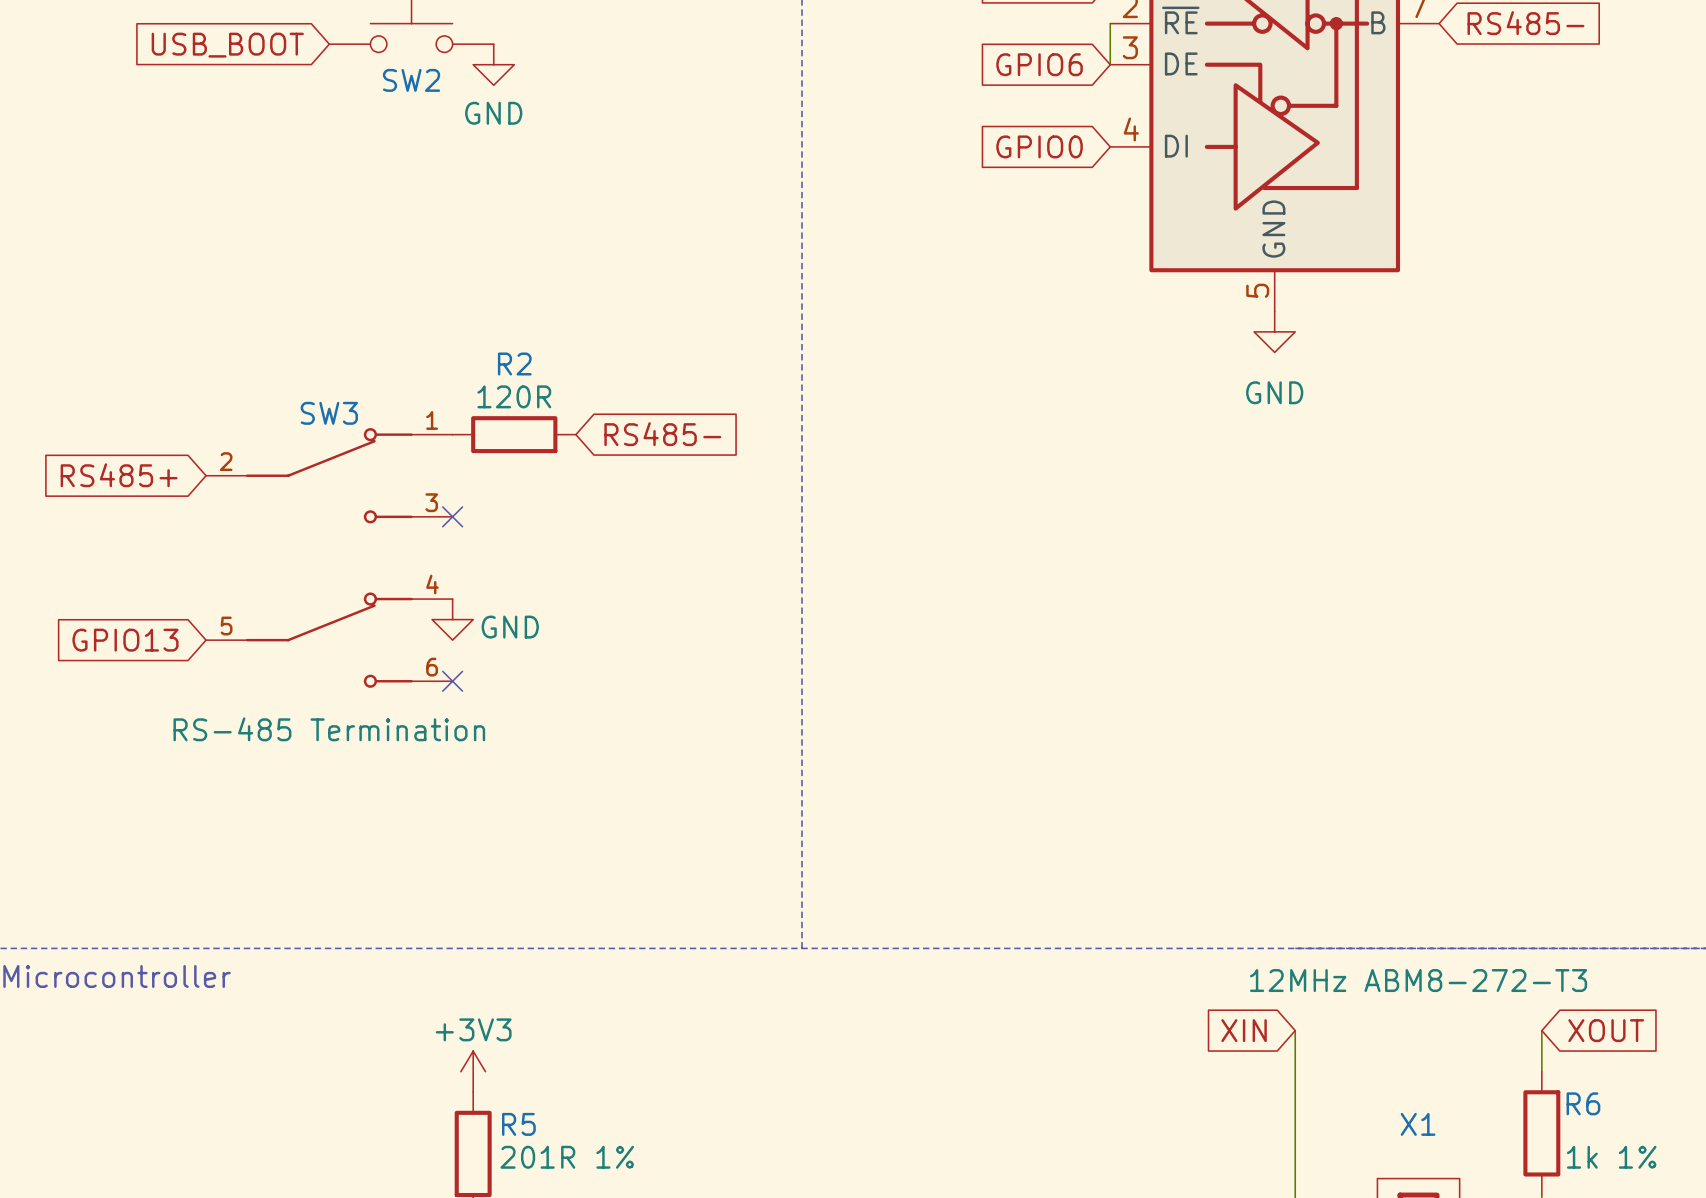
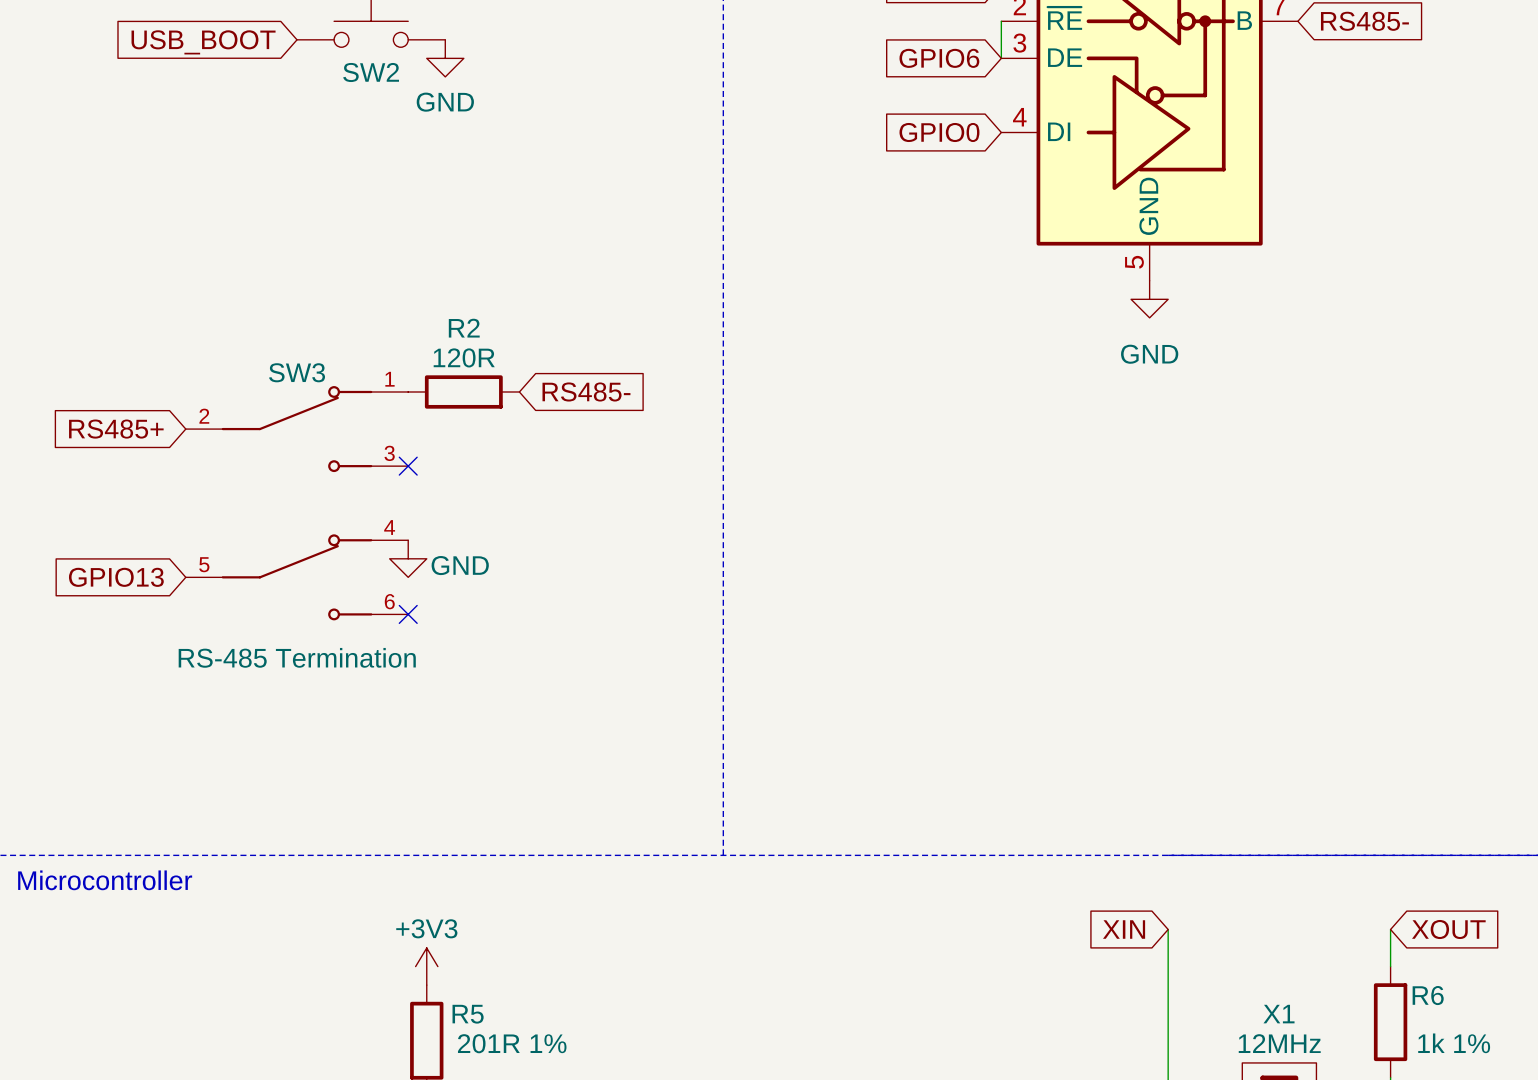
X1 value: 12MHz ABM8-272-T3 (1418, 980) -> 12MHz (1279, 1043)

